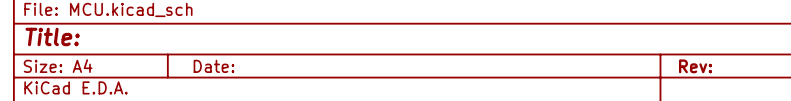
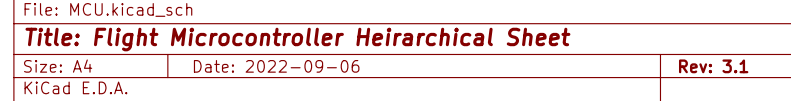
title block: Title: (52, 36) -> Title: Flight Microcontroller Heirarchical Sheet (297, 39)
title block: Date: (213, 66) -> Date: 2022-09-06 (276, 66)
title block: Rev: (695, 66) -> Rev: 3.1 (713, 66)

